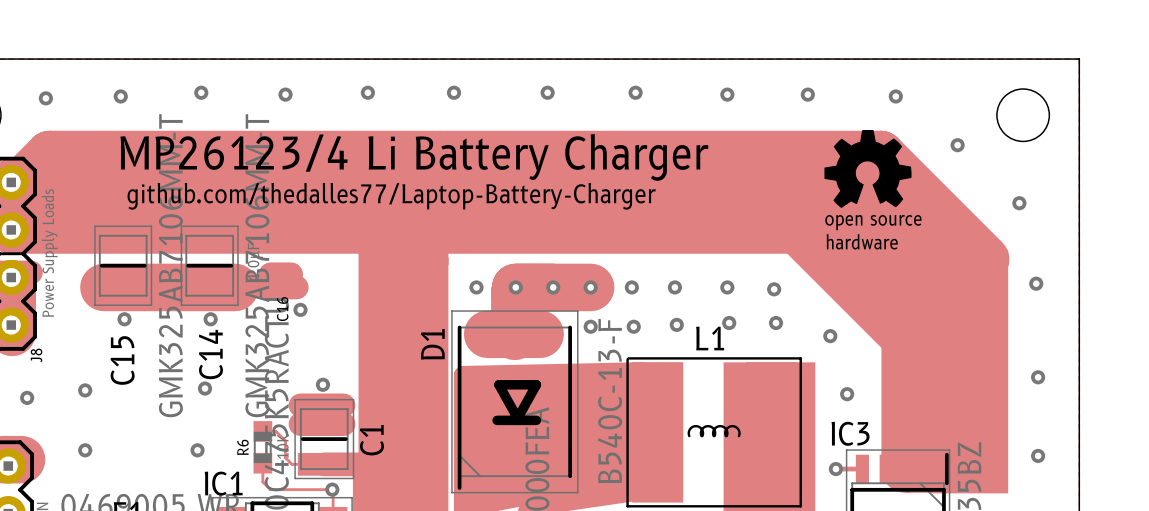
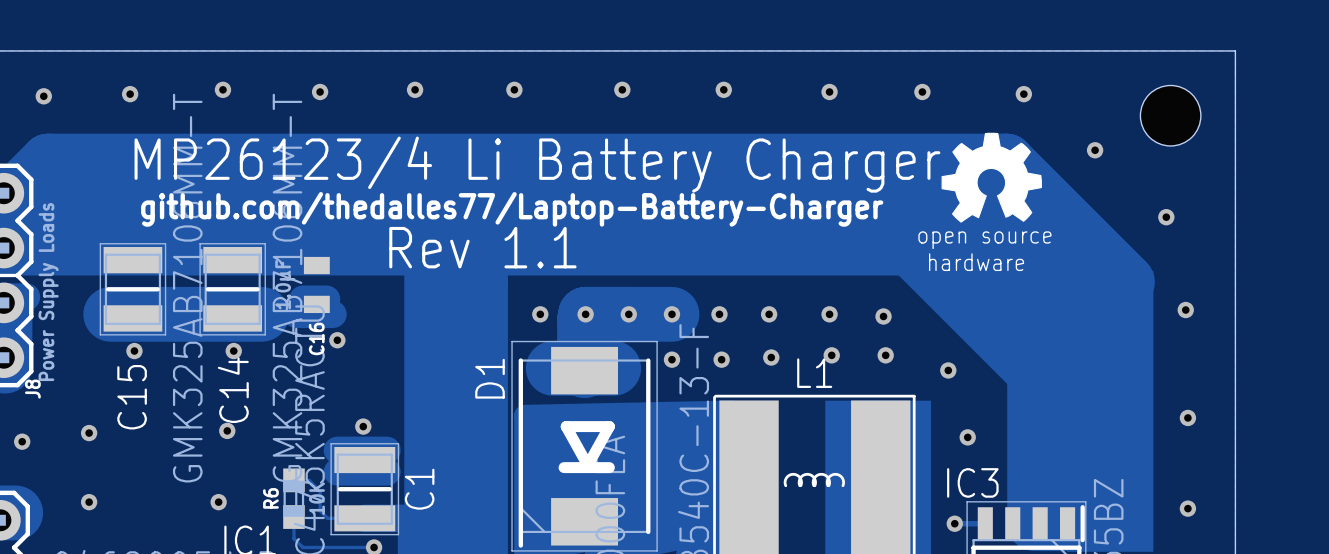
text: none -> Rev 1.1 (482, 247)

